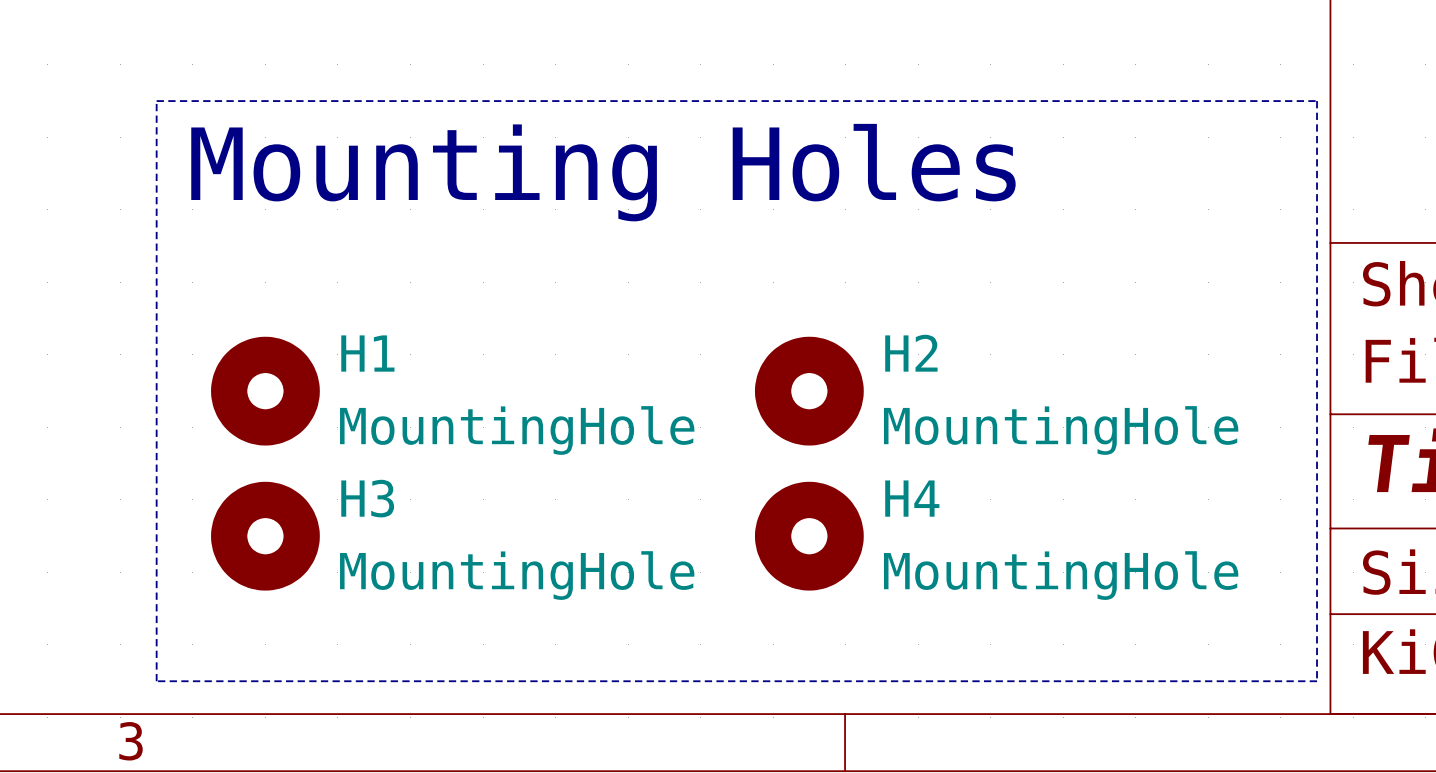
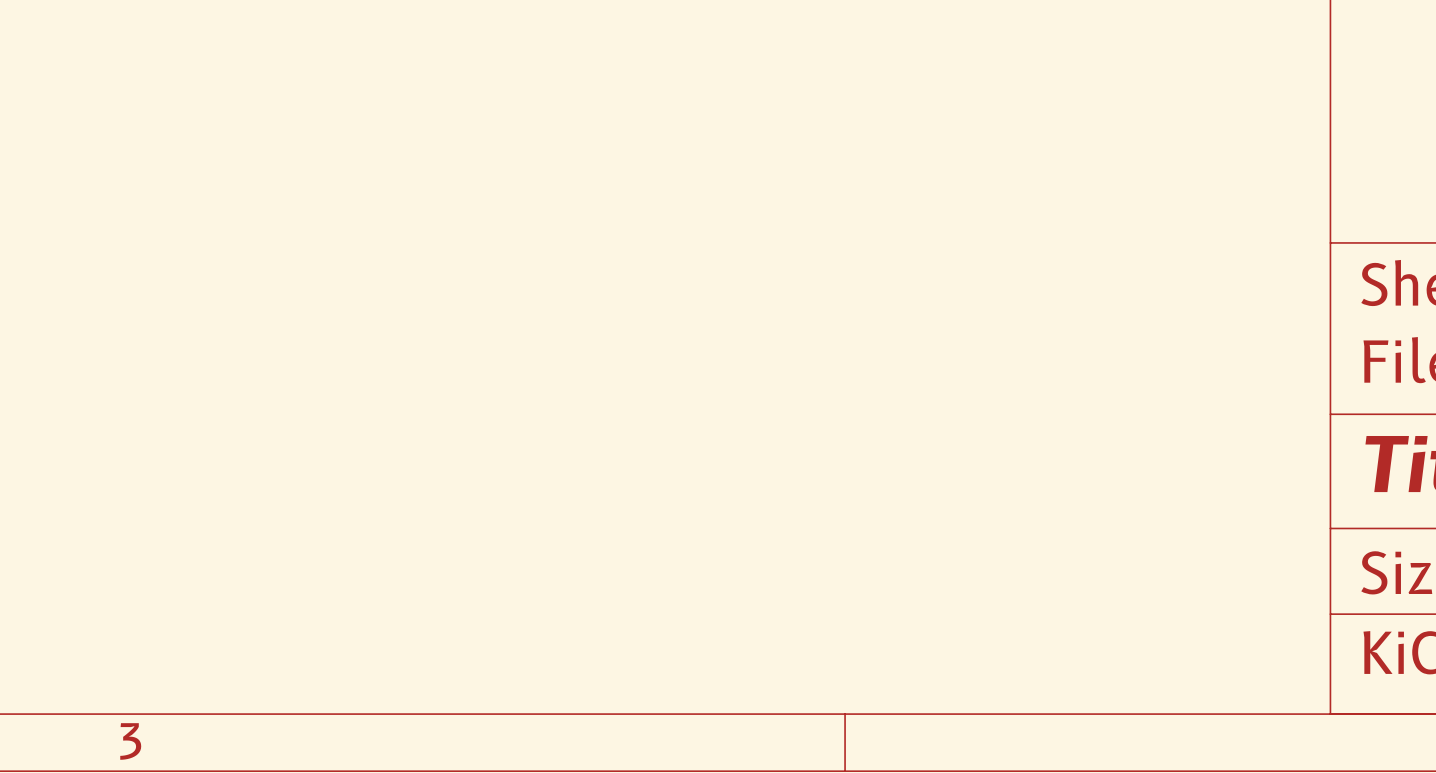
line: (156, 101) (1317, 101) (1317, 681) (156, 681) (156, 101) -> none
text: Mounting Holes (603, 172) -> none
H1: MountingHole (265, 391) -> none
H2: MountingHole (809, 391) -> none
H3: MountingHole (265, 536) -> none
H4: MountingHole (809, 536) -> none

